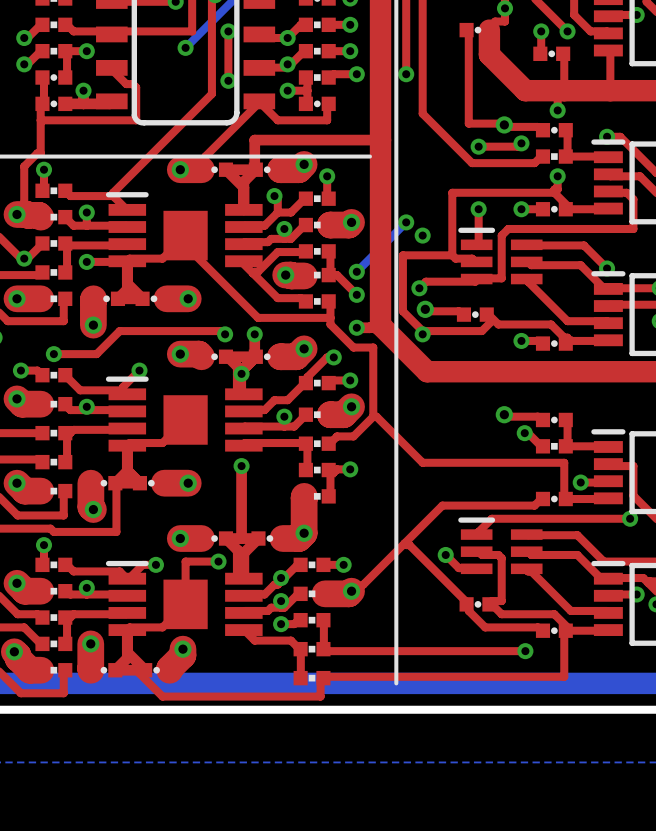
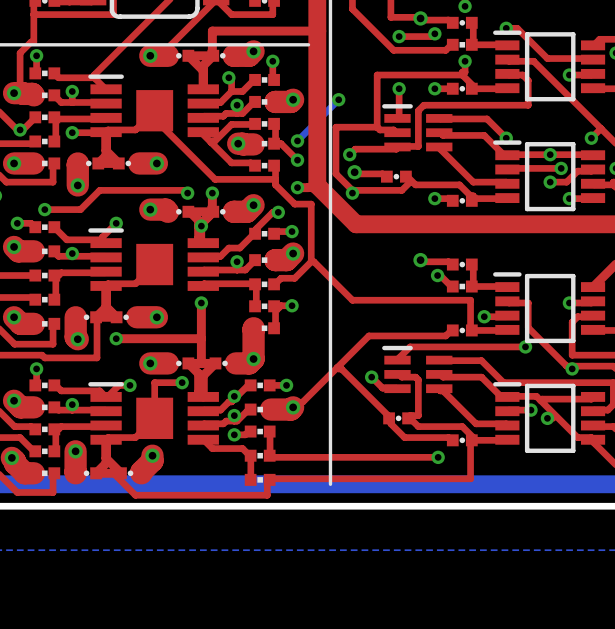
via: (422, 235) -> none
top track: none -> (116, 338) (201, 338)
via: none -> (116, 338)

